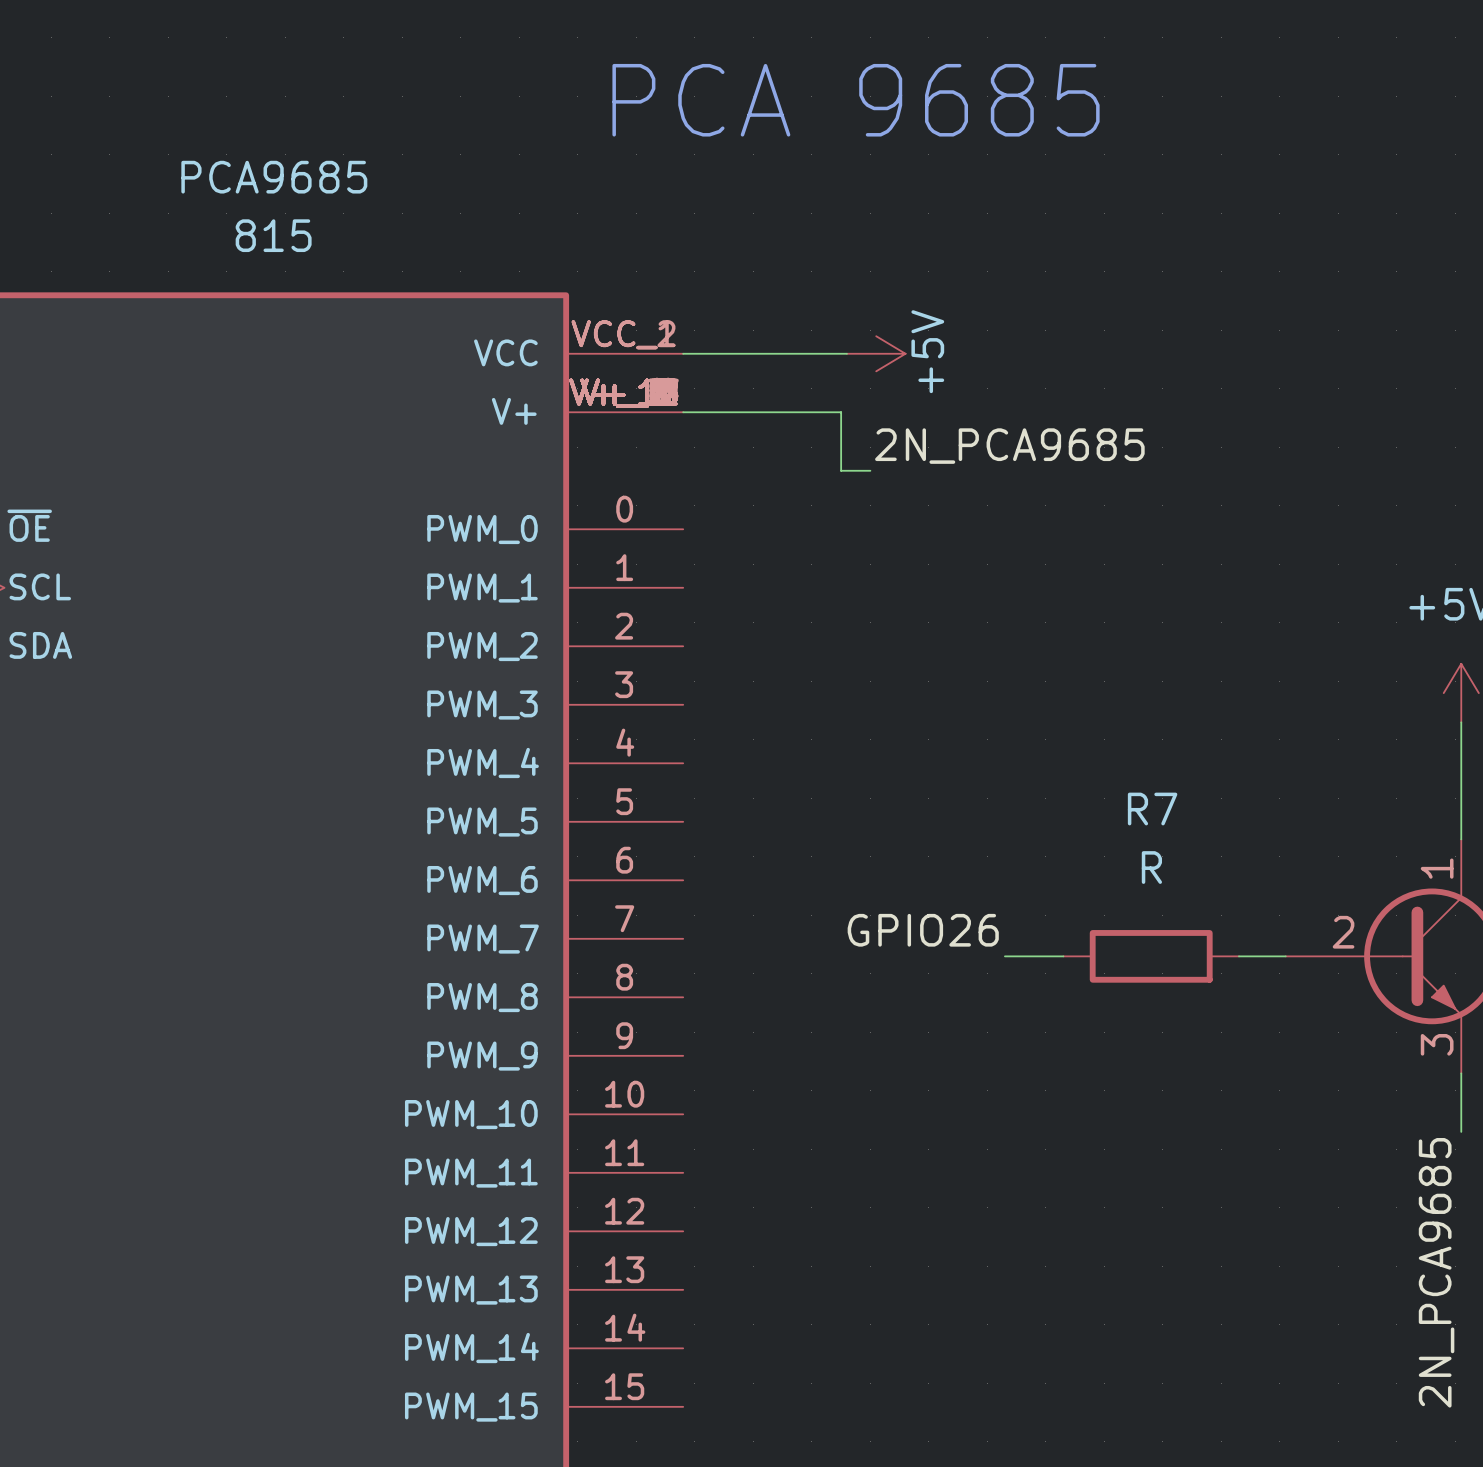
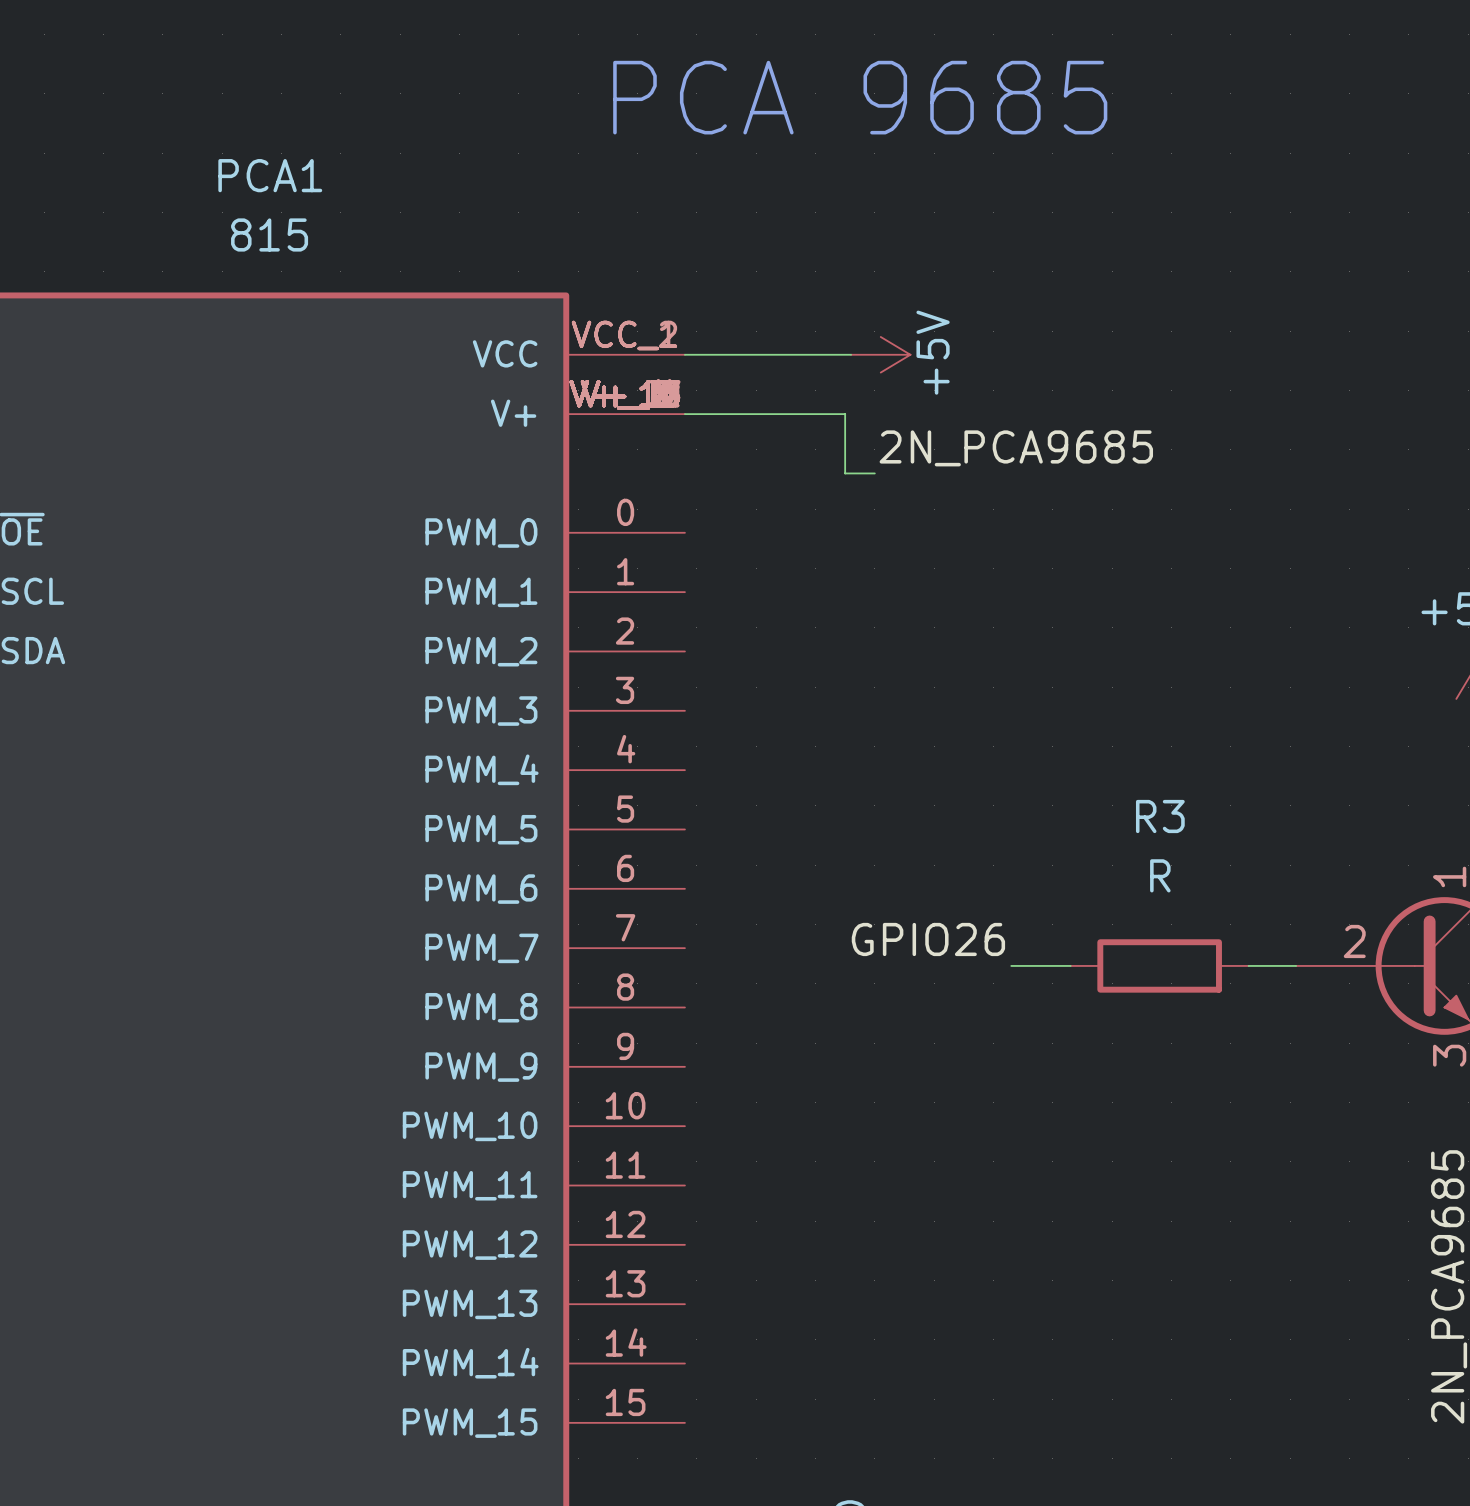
PCA9685 name: PCA9685 (274, 177) -> PCA1 (270, 175)
R7 name: R7 (1152, 809) -> R3 (1160, 816)

